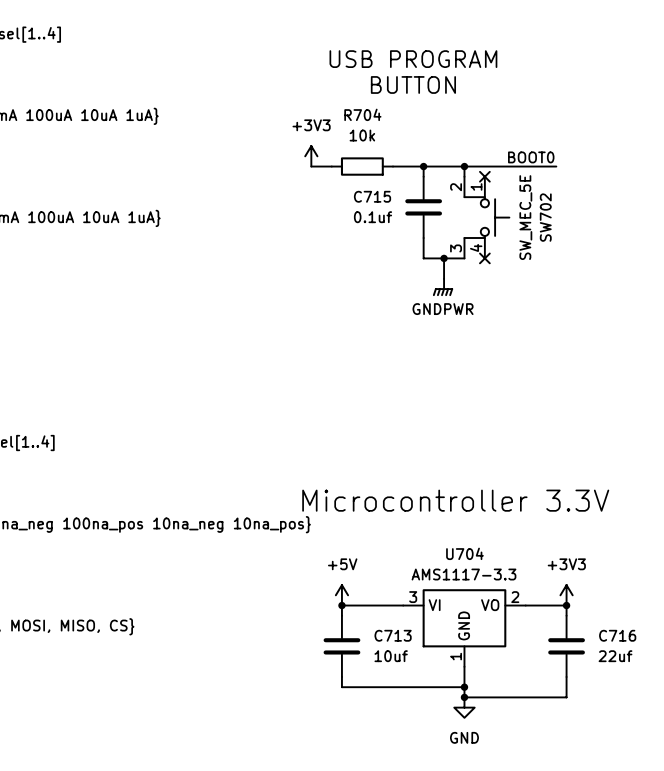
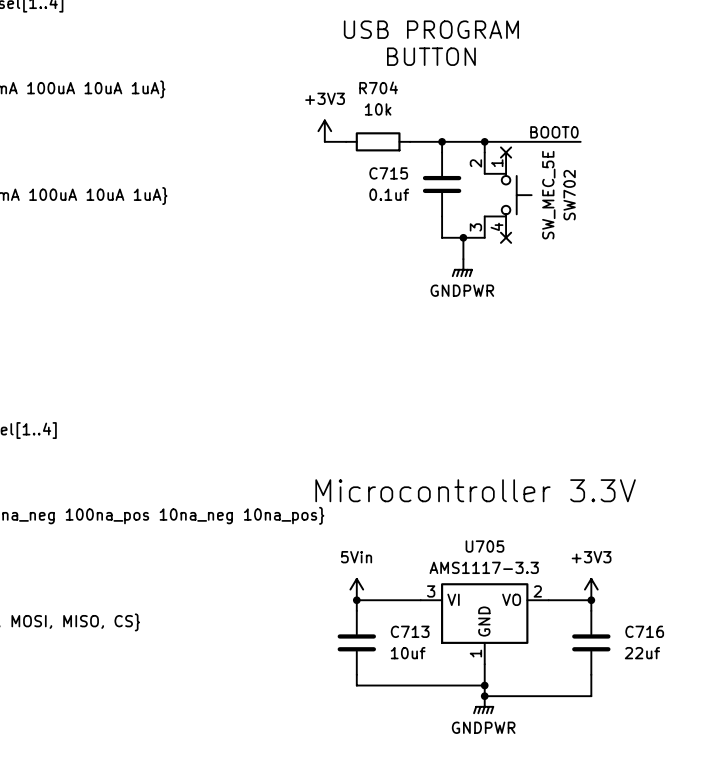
U704 name: U704 (464, 553) -> U705 (484, 546)
power symbol: +5V (341, 595) -> 5Vin (356, 589)
power symbol: GND (464, 707) -> GNDPWR (483, 705)

